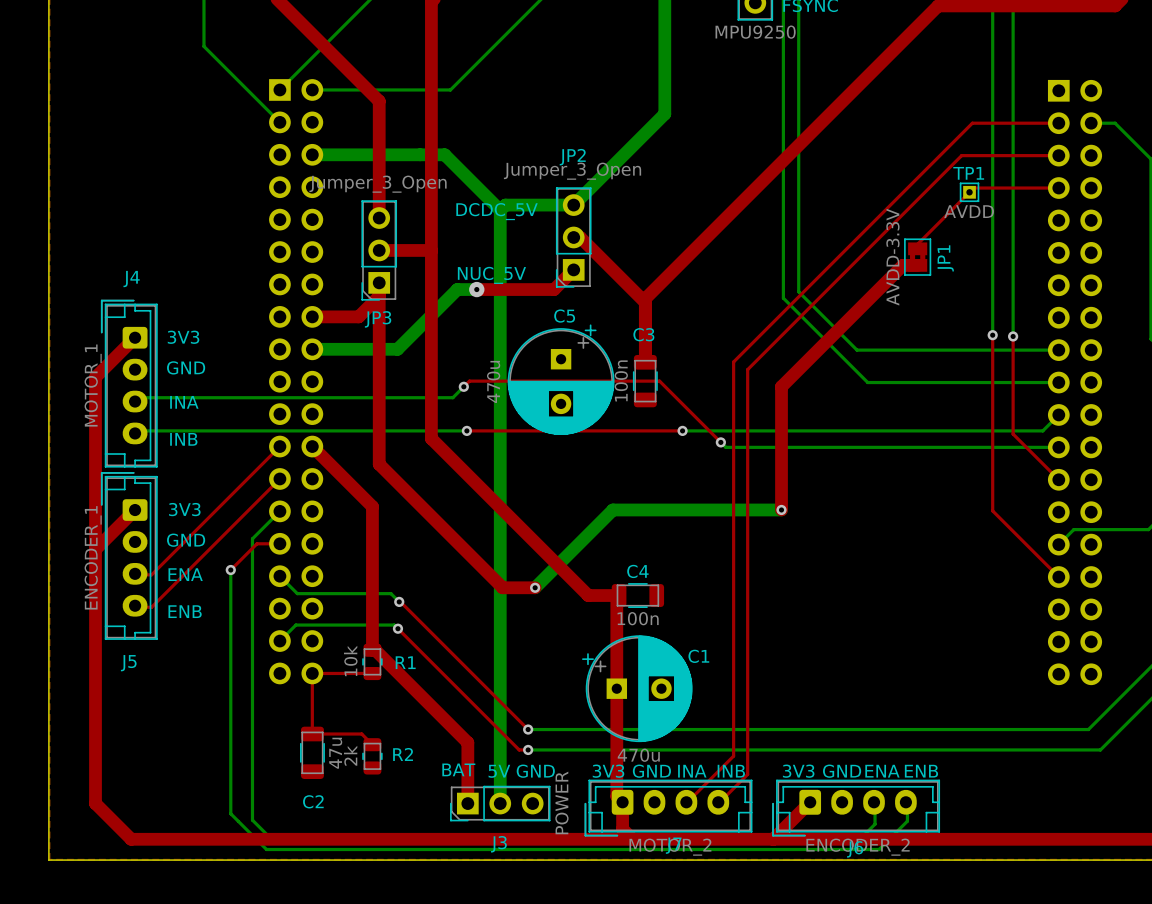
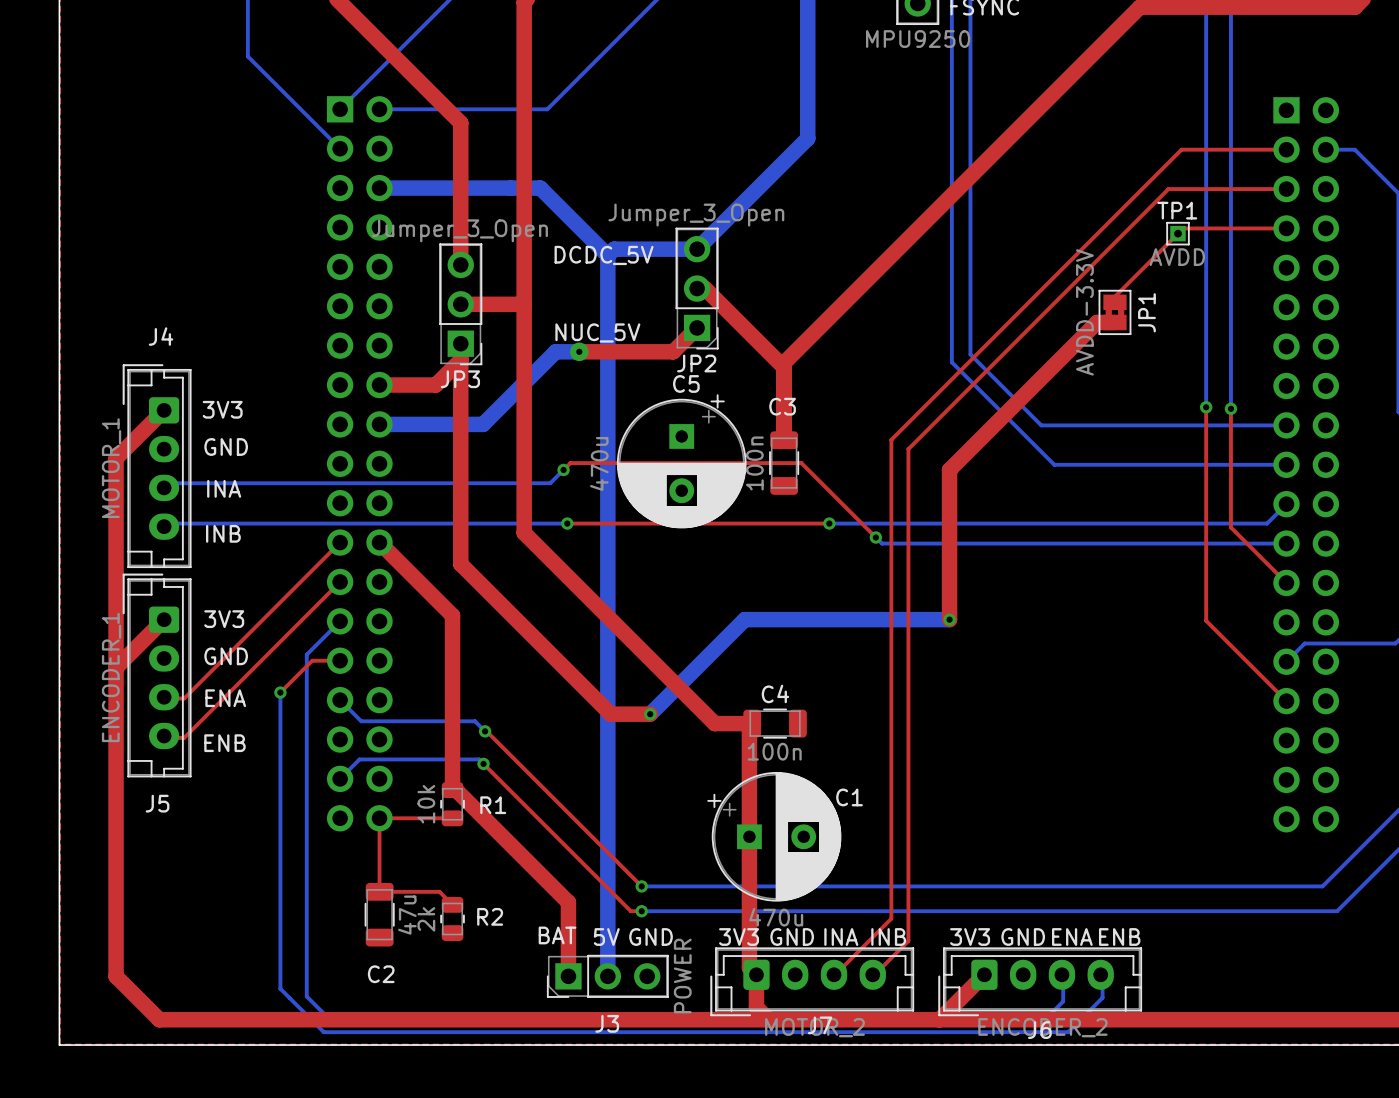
JP2 name position: JP2 (572, 157) -> JP2 (696, 363)
JP2 footprint: [555, 187, 592, 288] -> [675, 227, 719, 350]
JP3 footprint: [361, 200, 397, 301] -> [439, 243, 483, 366]

